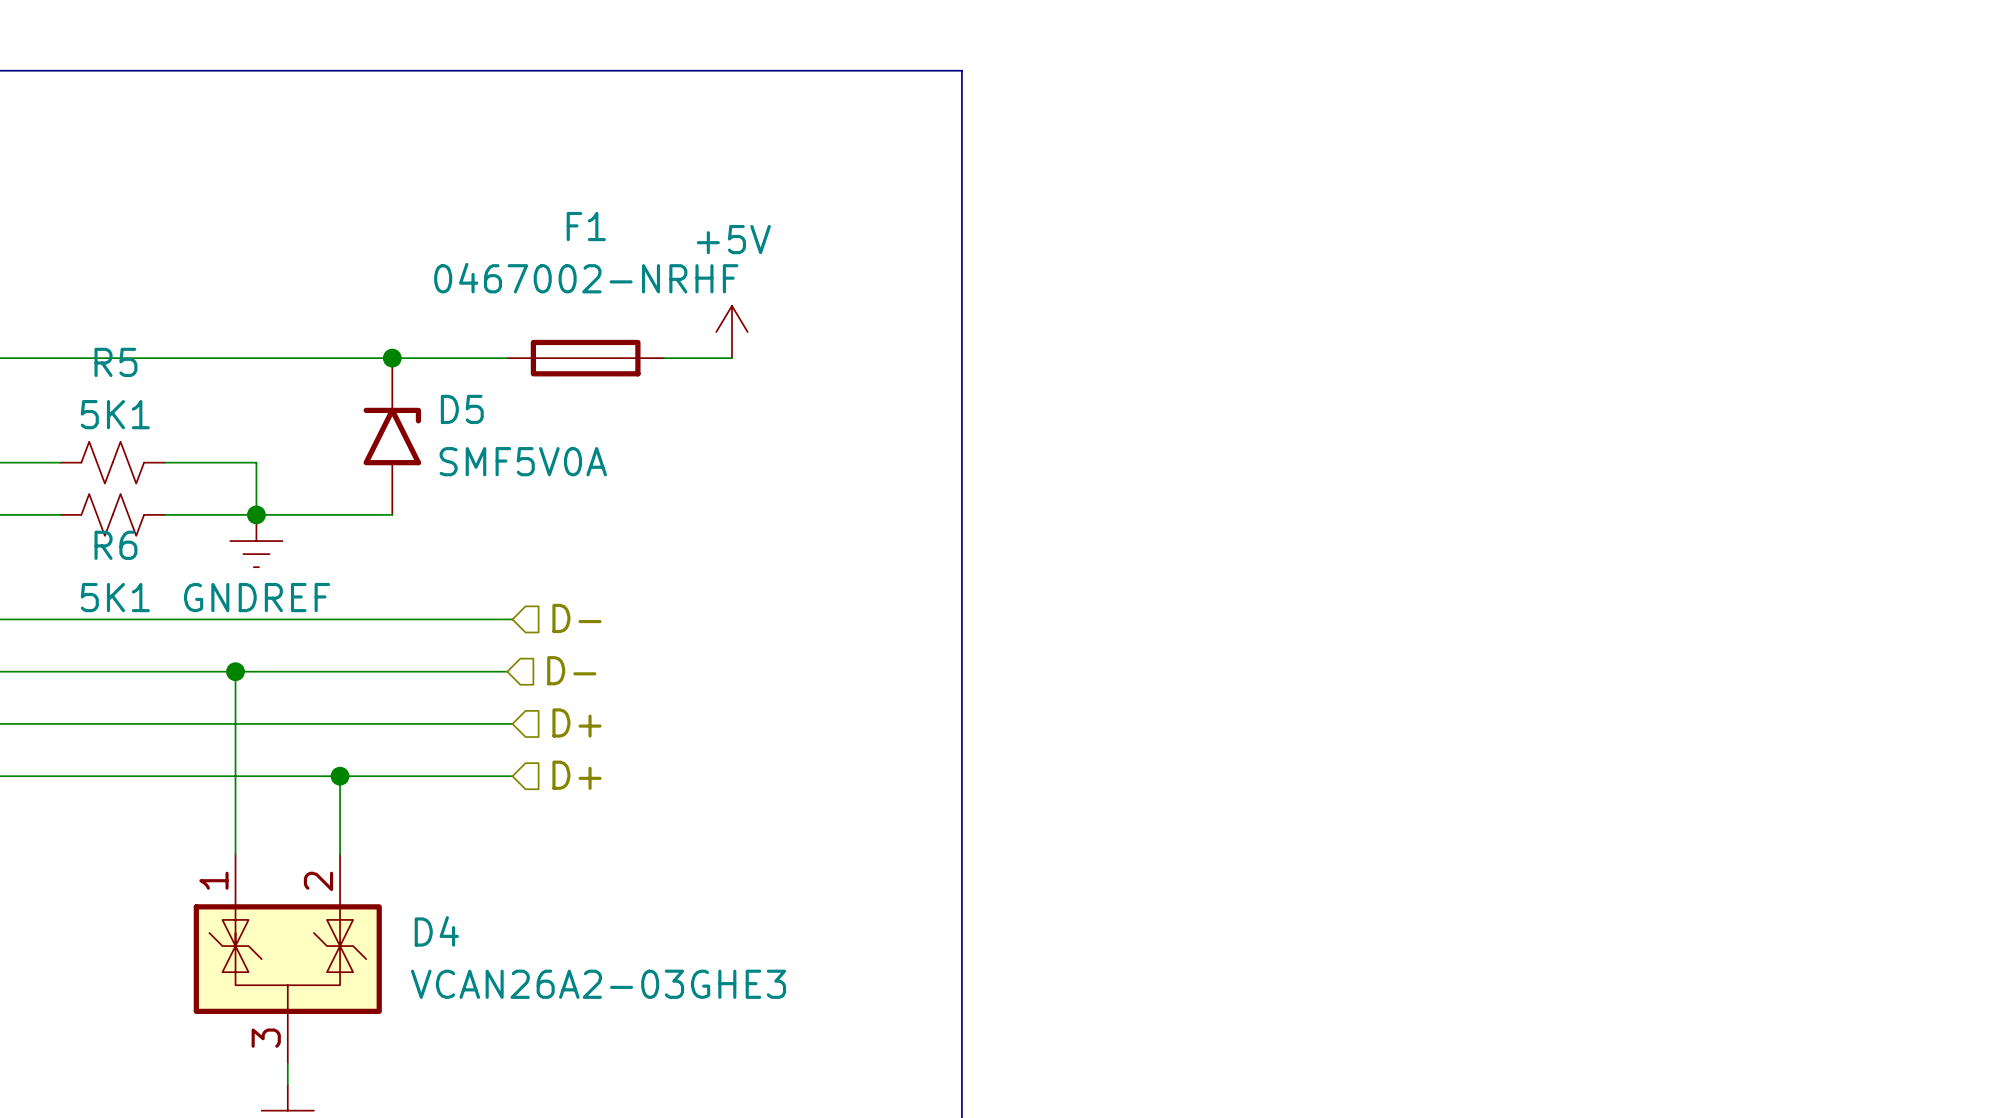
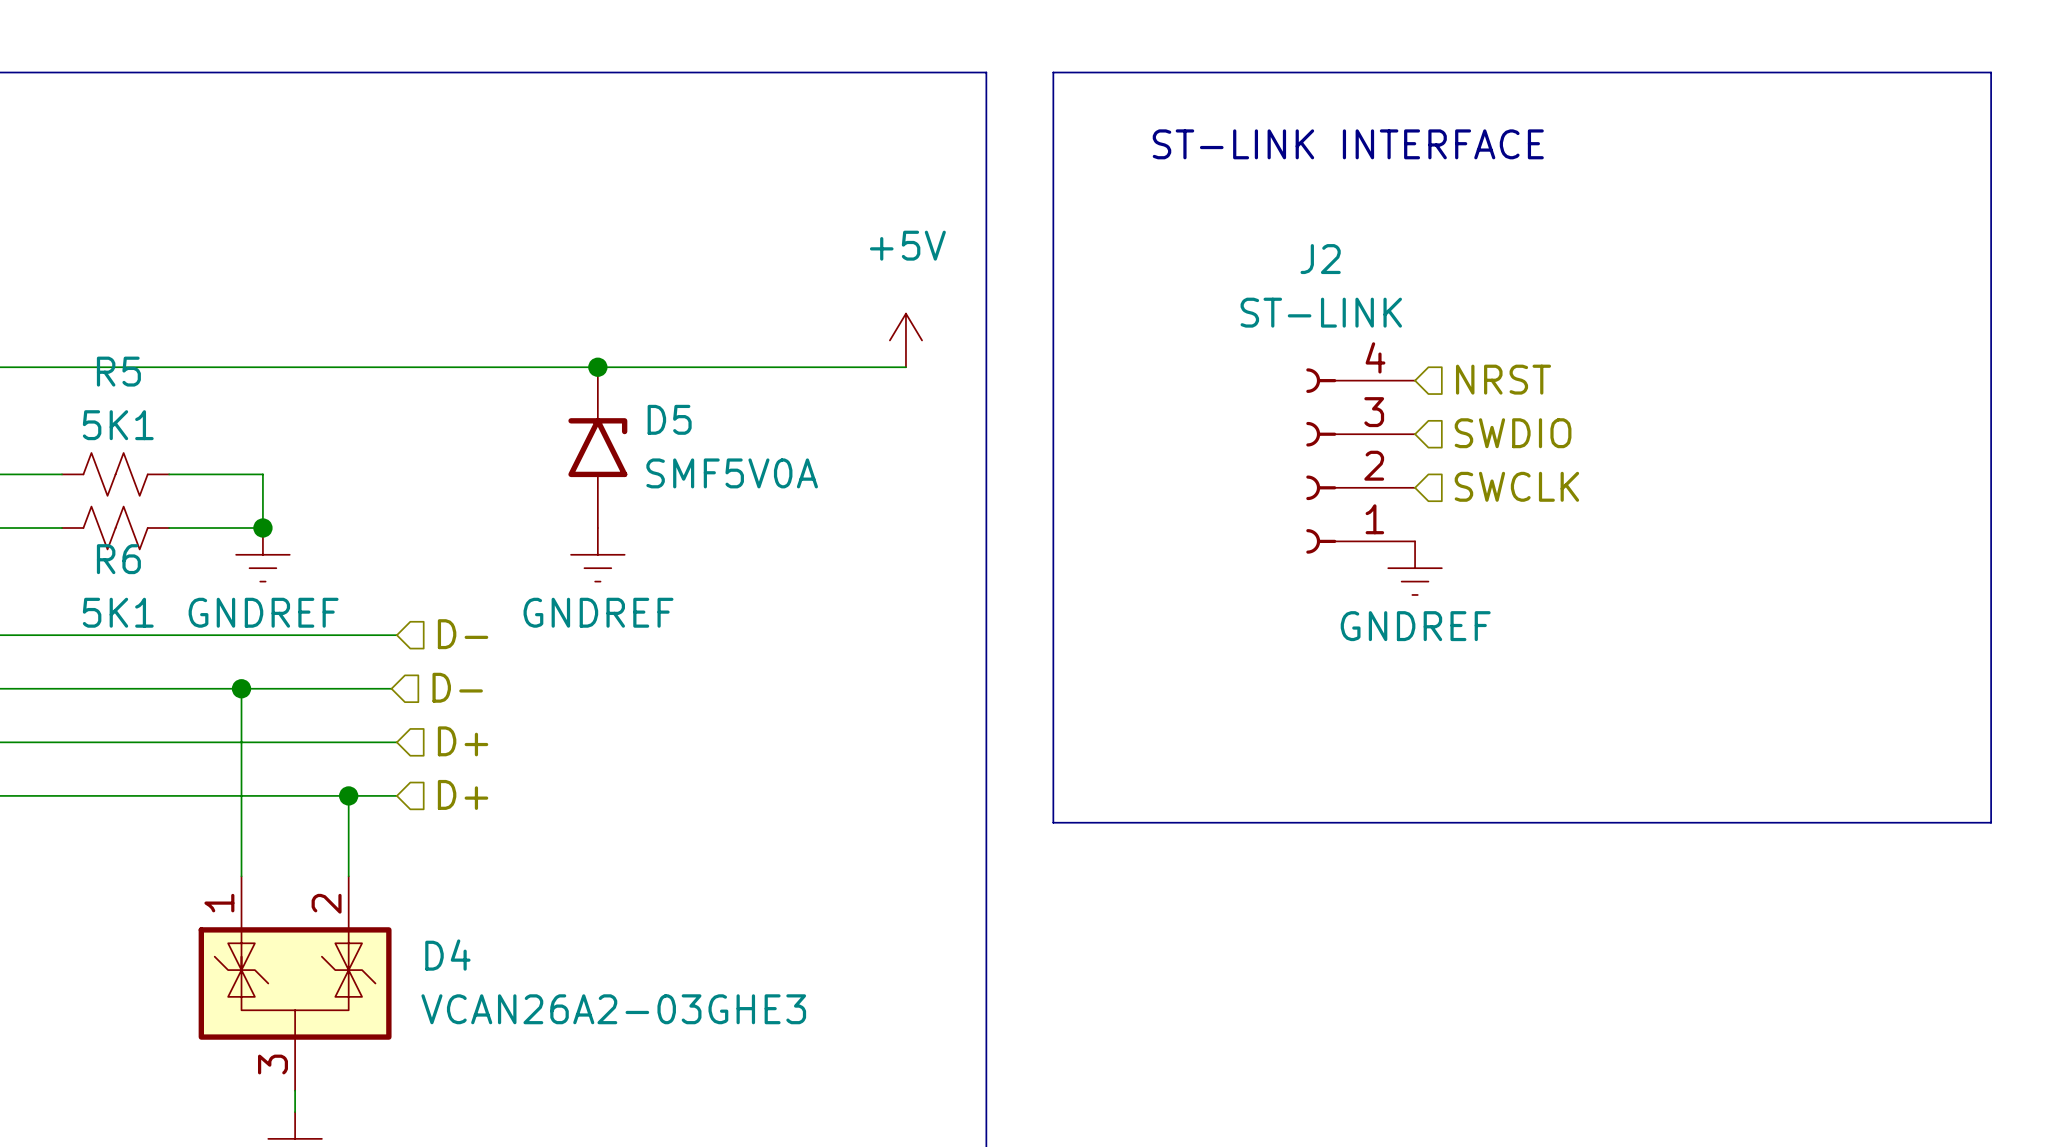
line: none -> (1053, 72) (1991, 72) (1991, 822) (1053, 822) (1053, 72)
text: none -> ST-LINK INTERFACE (1348, 144)
power symbol position: +5V (731, 332) -> +5V (905, 340)
junction: (392, 358) -> none
junction: none -> (597, 367)
F1: 0467002-NRHF (585, 358) -> none
wire: none -> (750, 367) (905, 367)
hierarchical label: none -> NRST (1503, 379)
hierarchical label: none -> SWDIO (1513, 433)
D5 position: (392, 436) -> (597, 447)
J2: none -> ST-LINK (1360, 461)
hierarchical label: none -> SWCLK (1516, 486)
wire: (256, 514) (392, 514) -> none
power symbol: none -> GNDREF (597, 554)
power symbol: none -> GNDREF (1415, 568)
hierarchical label: none -> D- (463, 634)
hierarchical label: D- (576, 618) -> none
wire: (387, 619) (512, 619) -> none
hierarchical label: none -> D- (457, 687)
hierarchical label: D- (571, 670) -> none
wire: (381, 671) (507, 671) -> none
hierarchical label: none -> D+ (463, 741)
hierarchical label: D+ (576, 722) -> none
wire: (387, 723) (512, 723) -> none
hierarchical label: none -> D+ (463, 794)
hierarchical label: D+ (576, 775) -> none
wire: (387, 776) (512, 776) -> none

